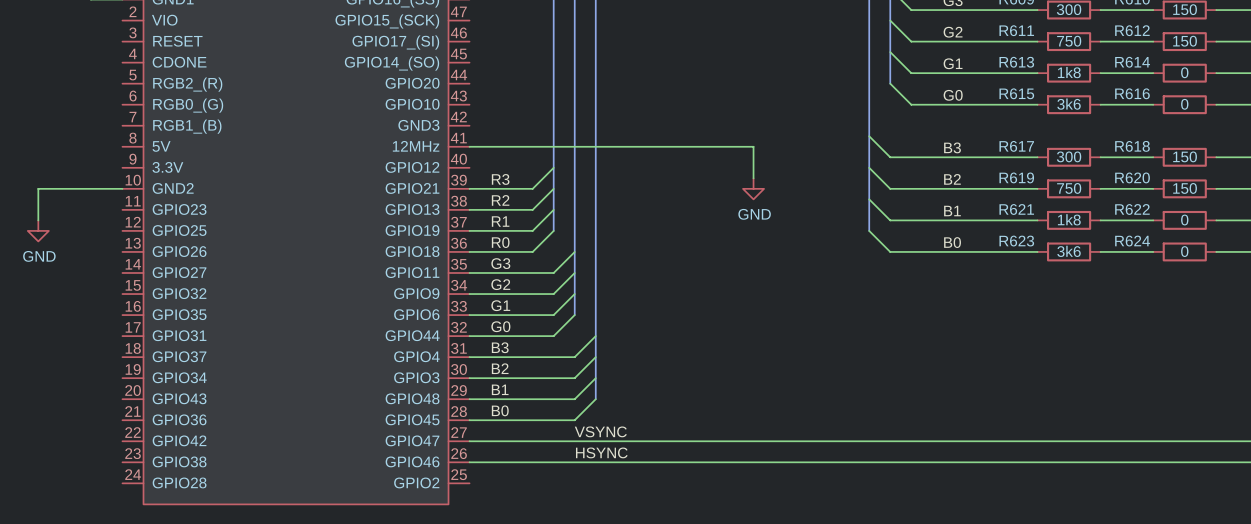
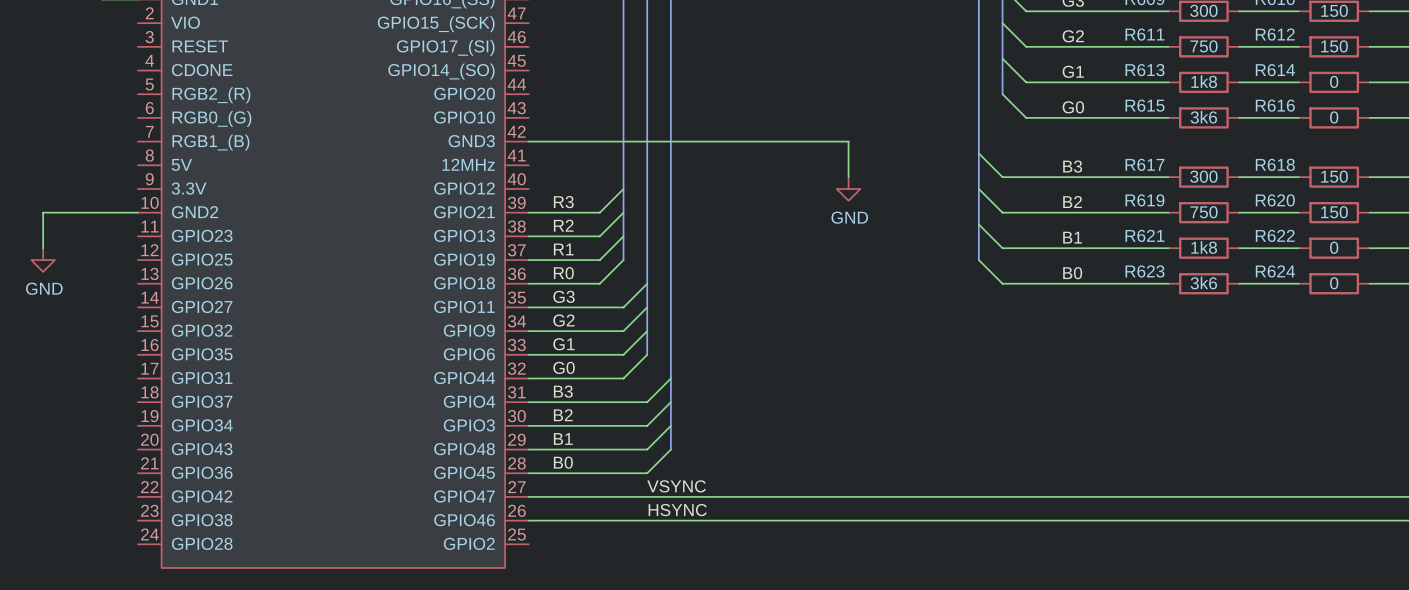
wire: (469, 146) (753, 146) -> (528, 141) (848, 141) (848, 165)
power symbol position: GND (753, 188) -> GND (848, 188)

